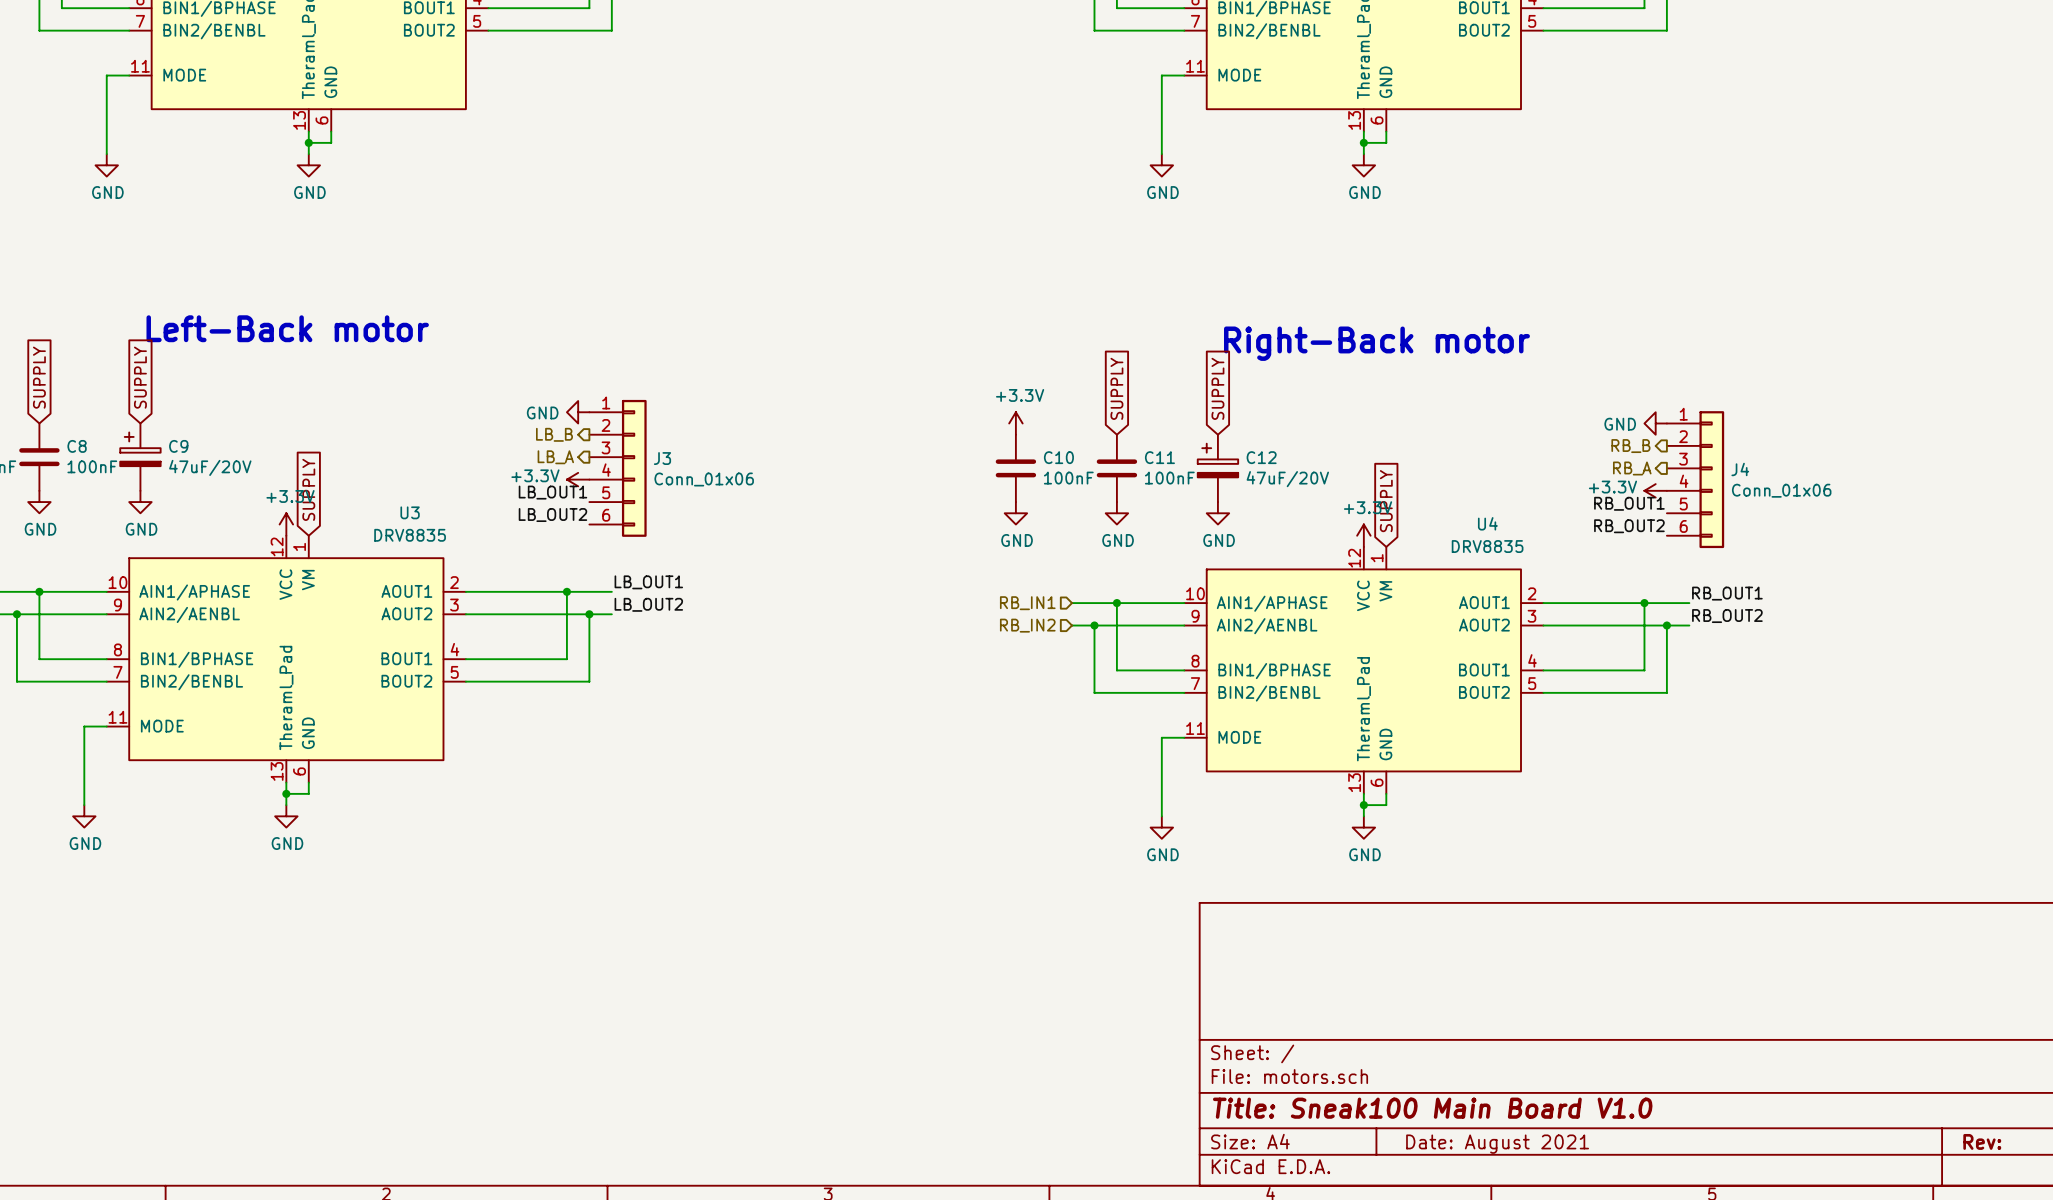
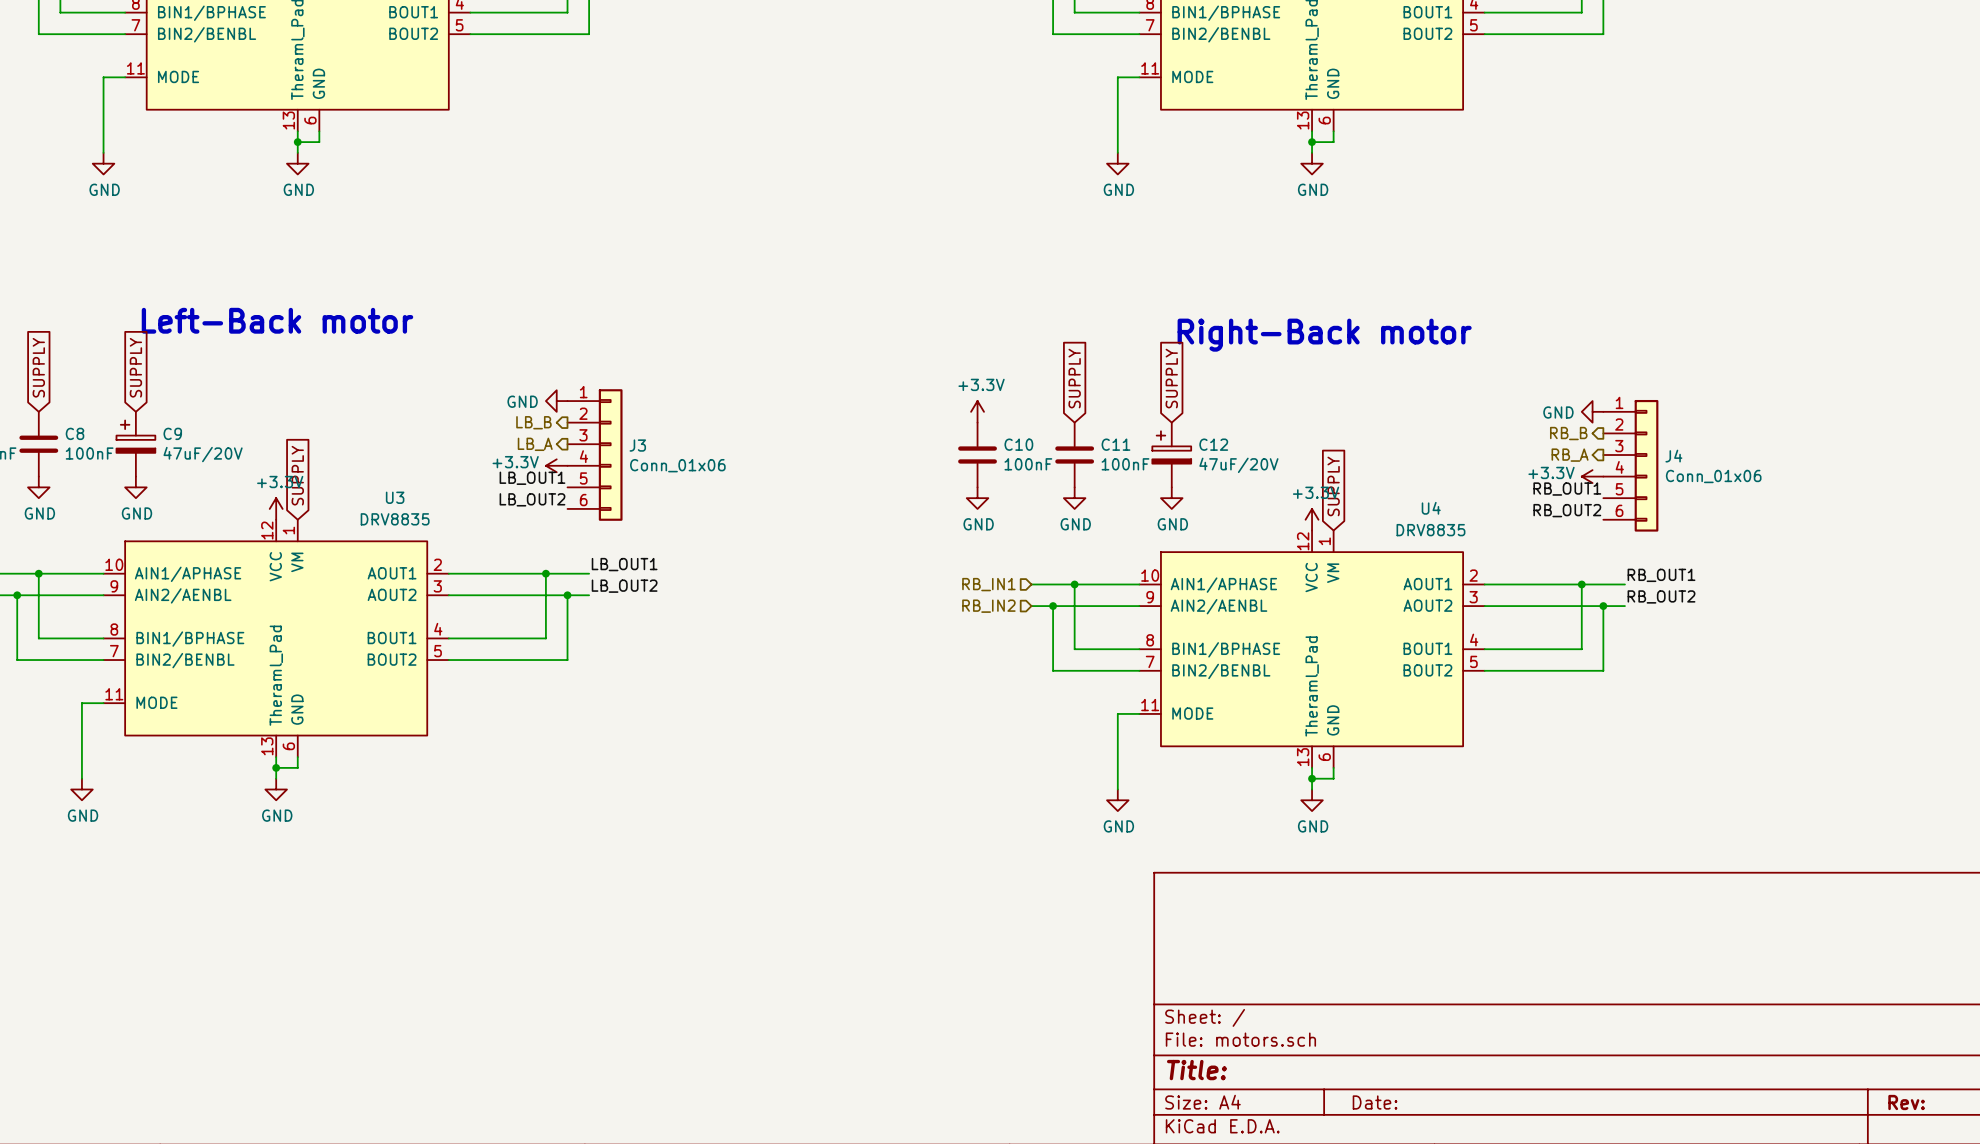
title block: Title: Sneak100 Main Board V1.0 (1432, 1108) -> Title: (1196, 1070)
title block: Date: August 2021 (1497, 1144) -> Date: (1375, 1102)

